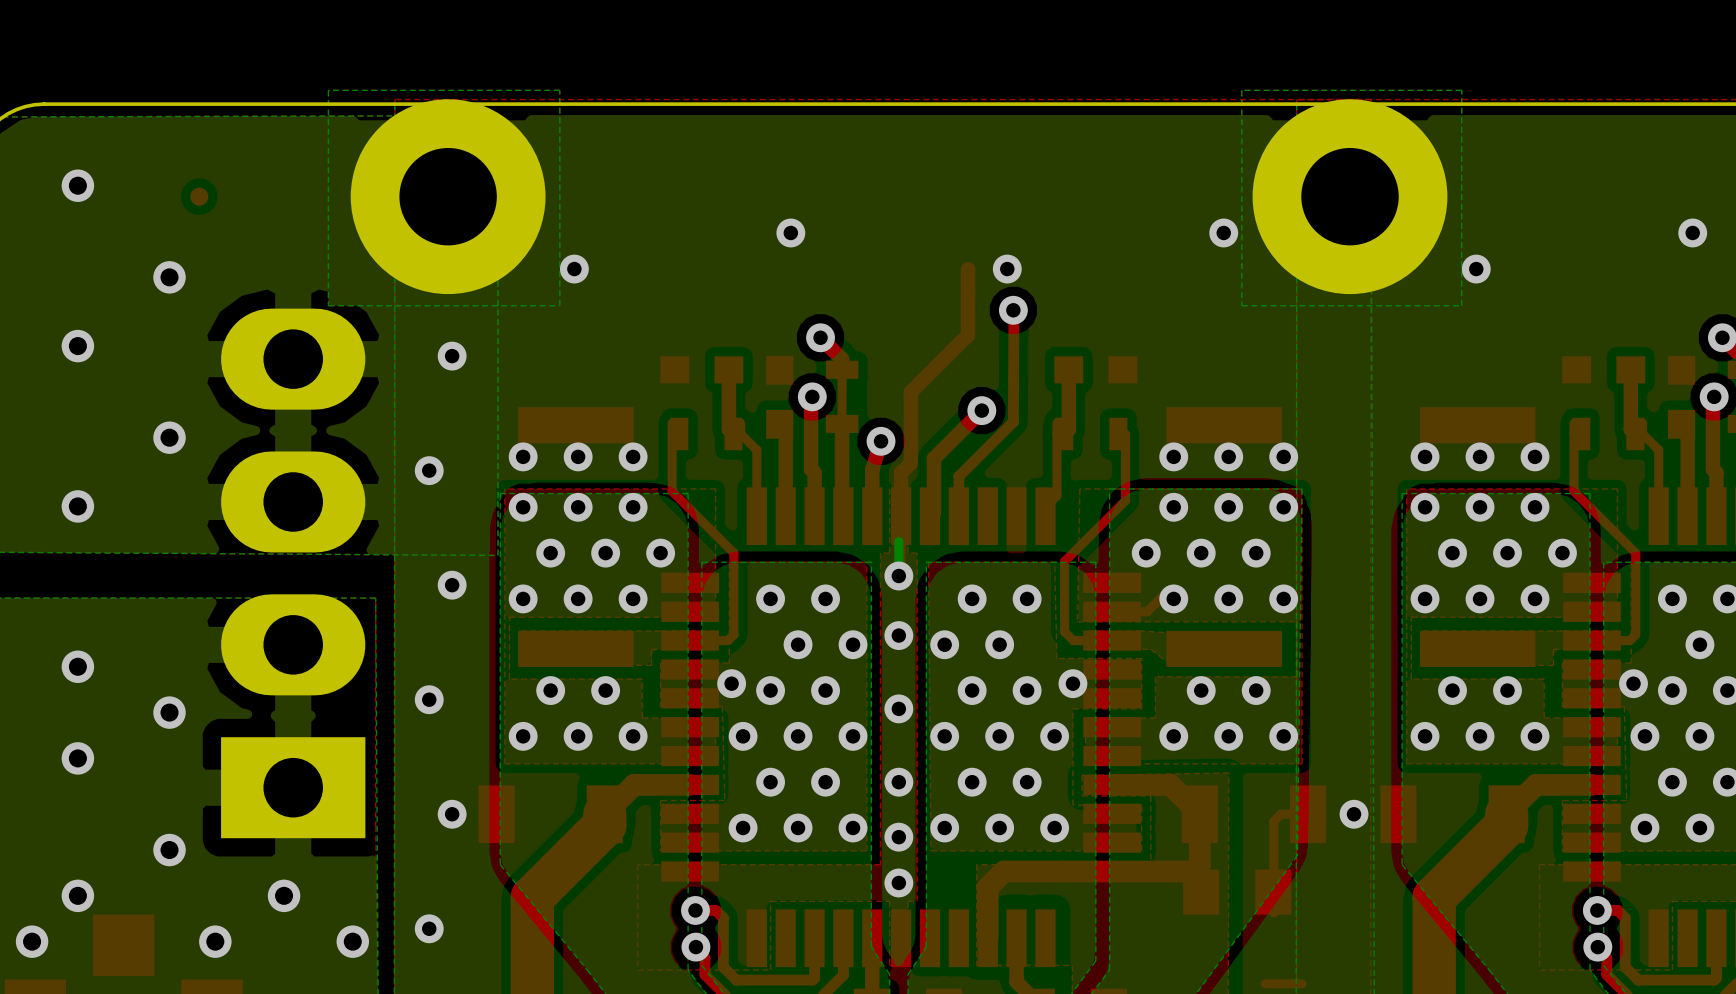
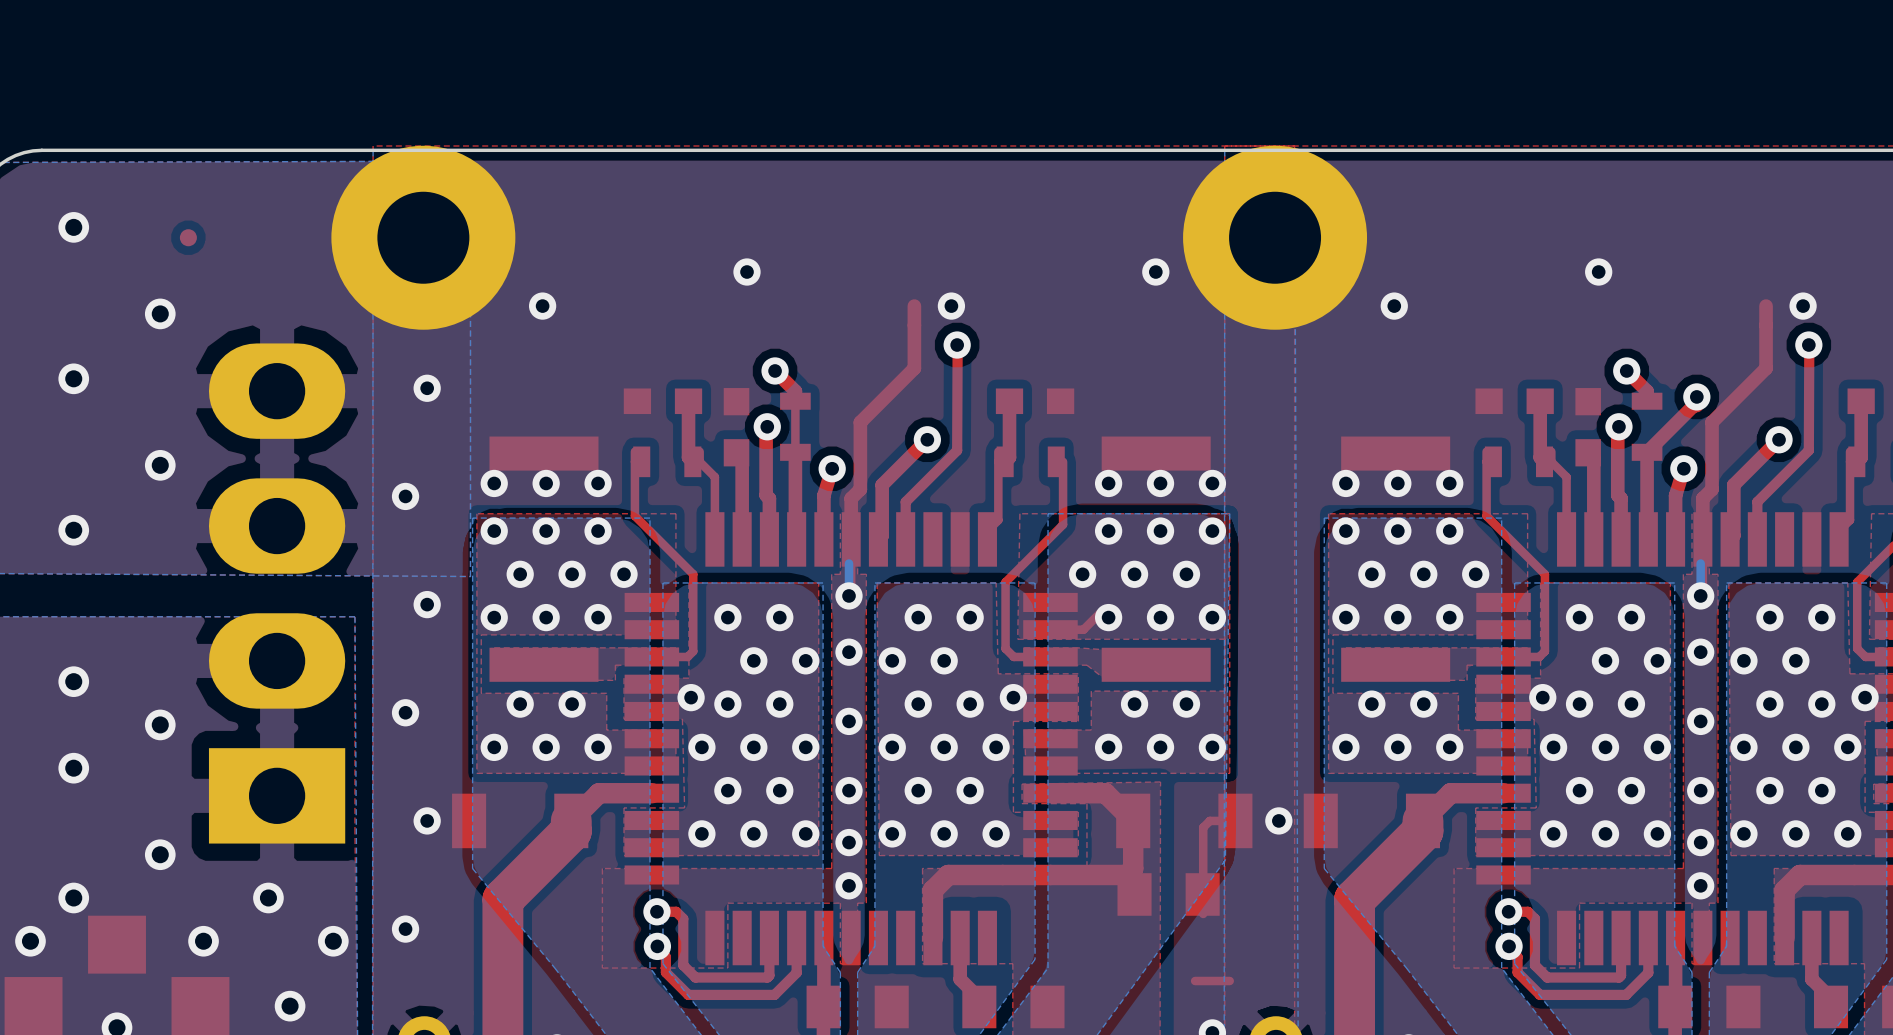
bottom zone outline: (559, 90) (328, 90) (328, 305) (559, 305) (559, 90) -> none
bottom zone outline: (1461, 90) (1241, 90) (1241, 305) (1461, 305) (1461, 90) -> none

